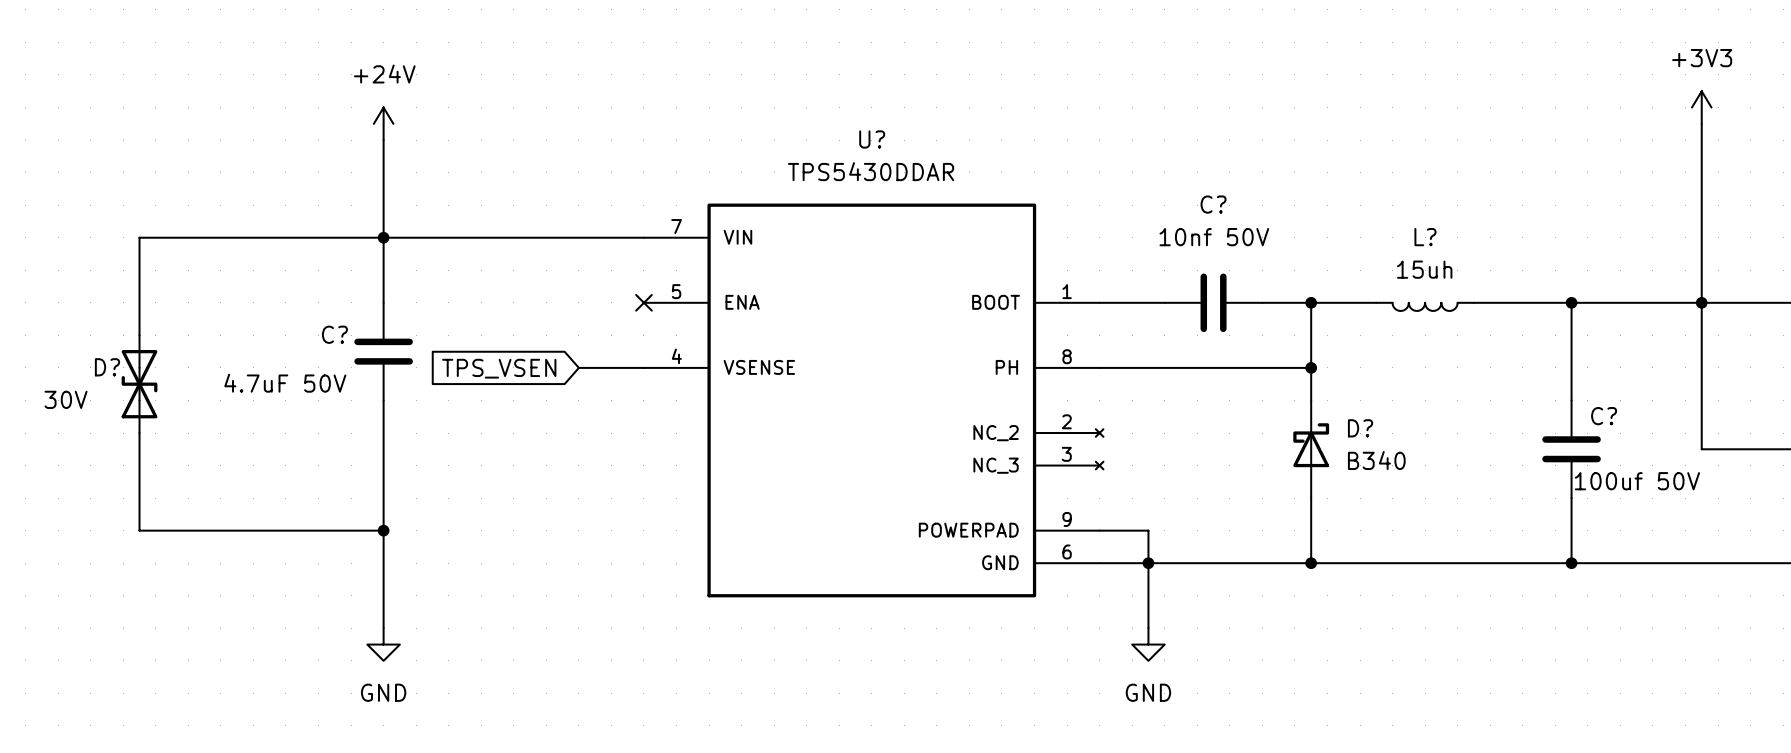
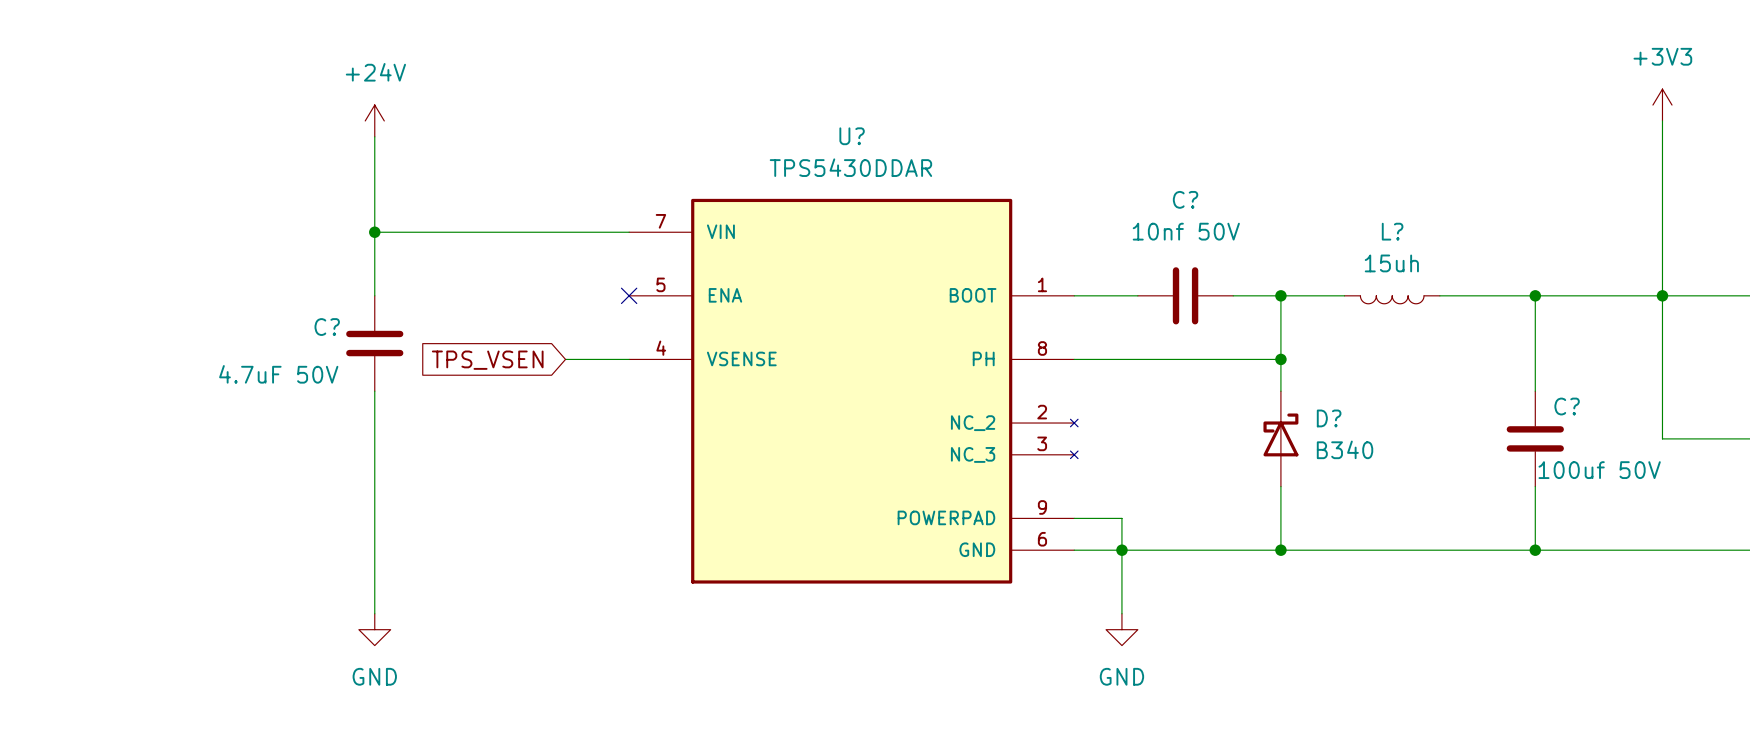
wire: (383, 237) (139, 237) (139, 335) -> none
D?: 30V (139, 384) -> none
wire: (139, 433) (139, 530) (383, 530) -> none
junction: (383, 530) -> none

